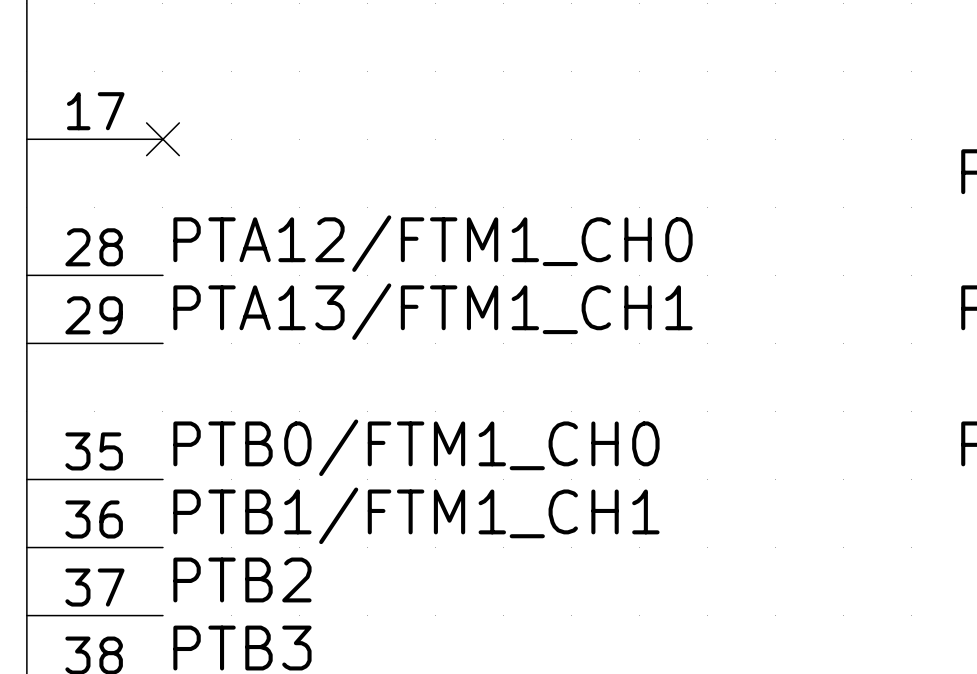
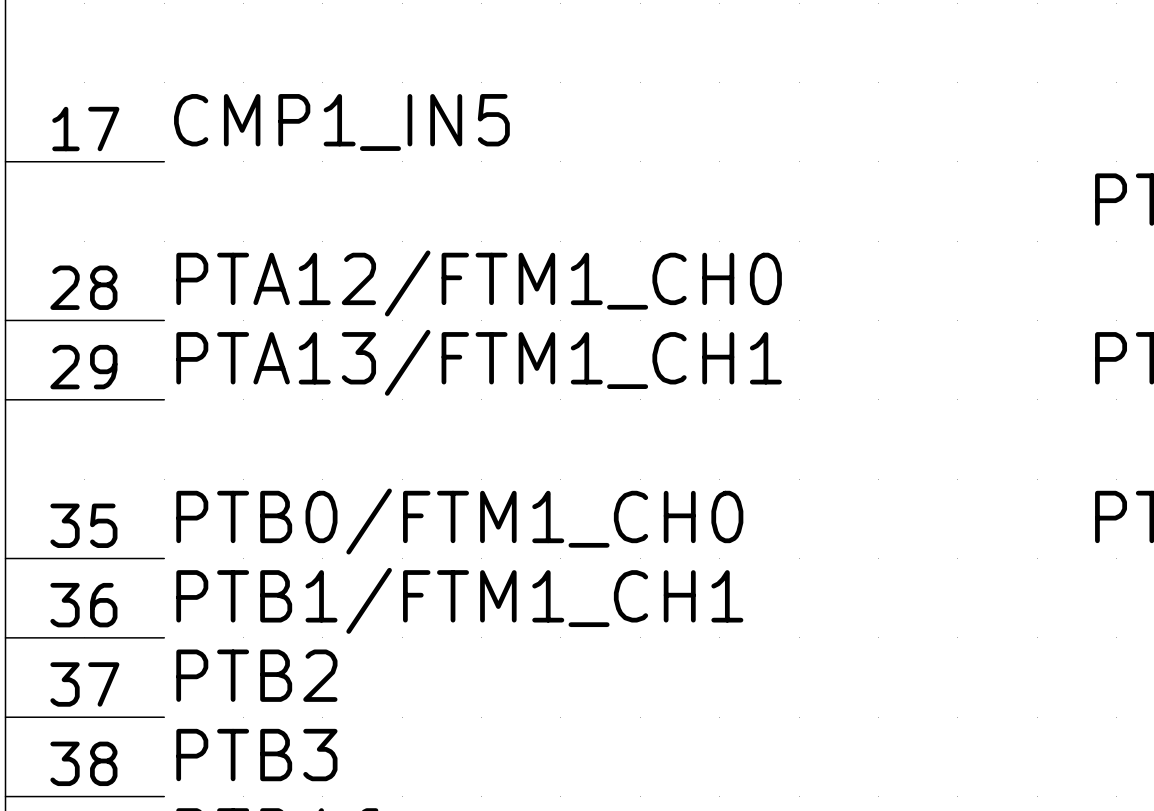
label: none -> CMP1_IN5 (341, 122)
no-connect mark: (162, 139) -> none

